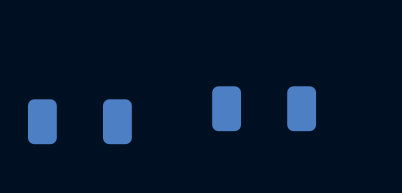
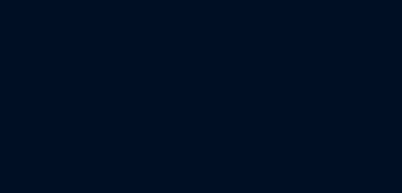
part: (264, 108) -> none
part: (79, 121) -> none

